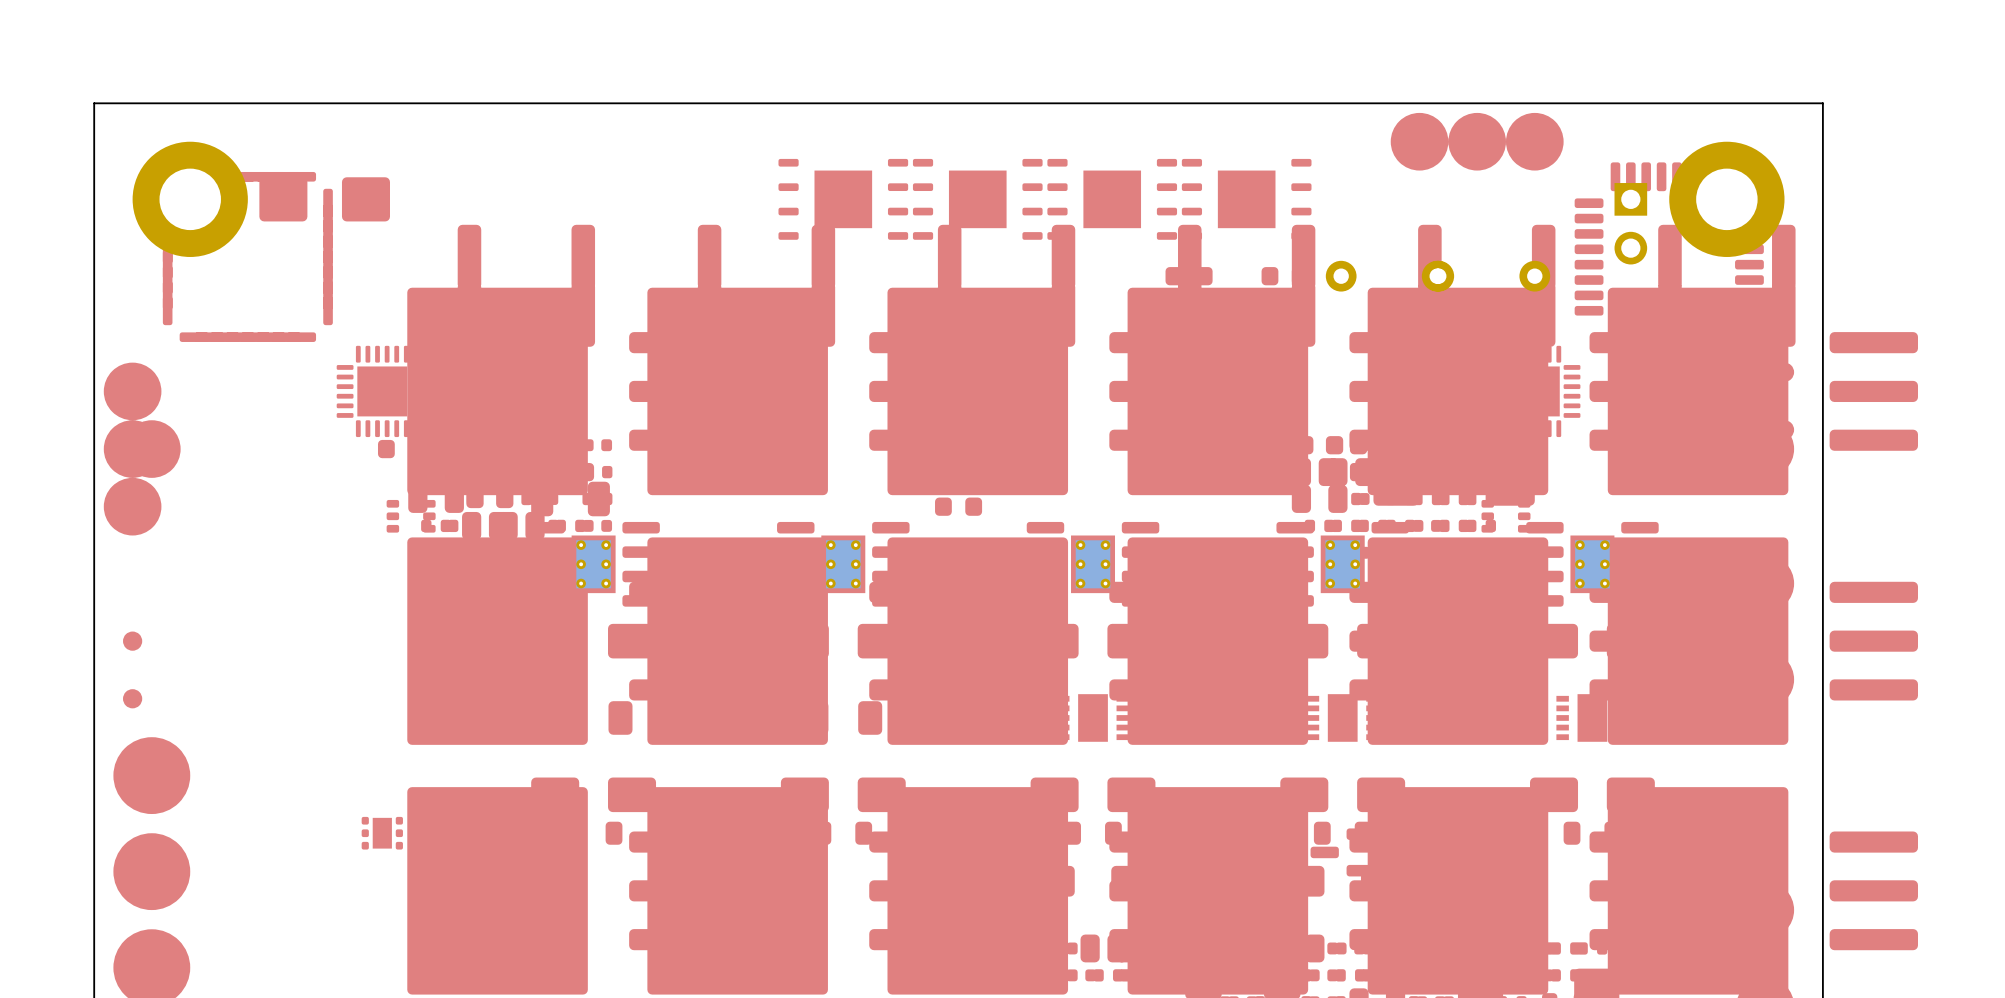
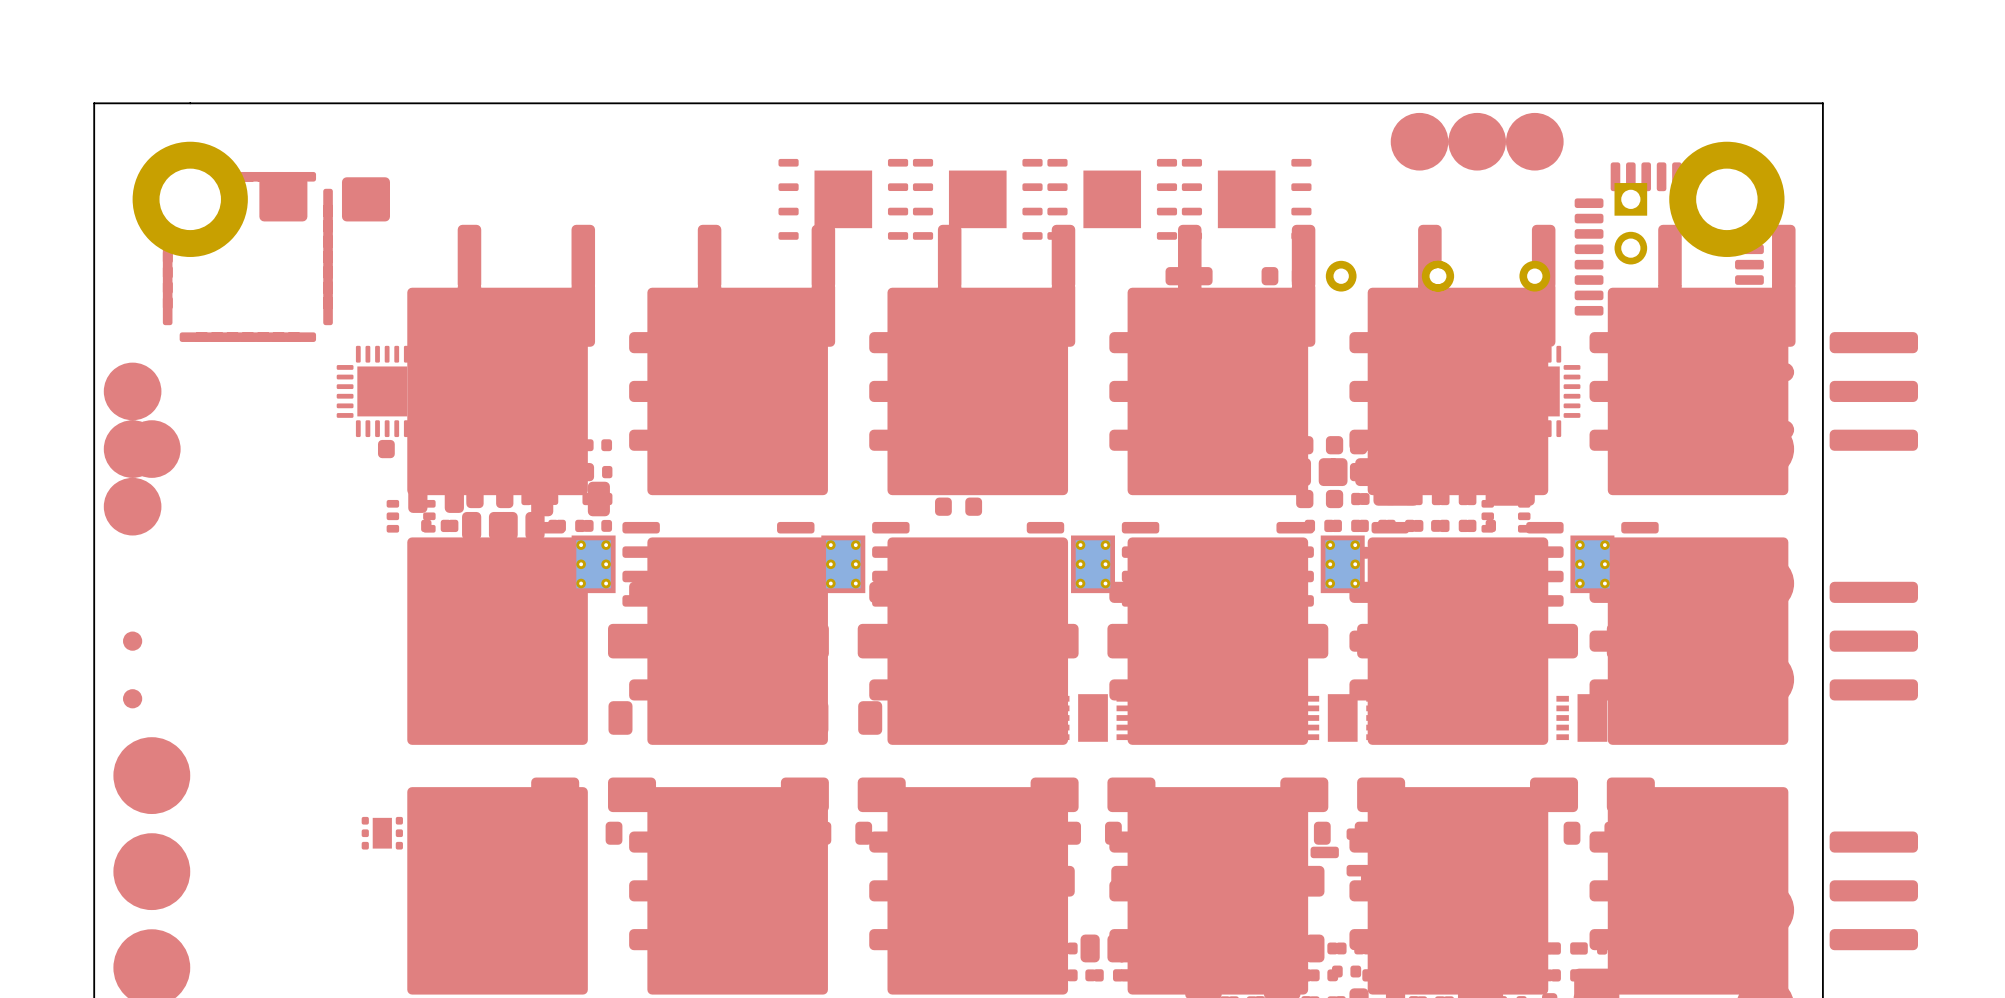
part footprint: [1291, 485, 1348, 513] -> [1296, 489, 1344, 509]
part footprint: [1335, 969, 1366, 982] -> [1331, 965, 1362, 978]

